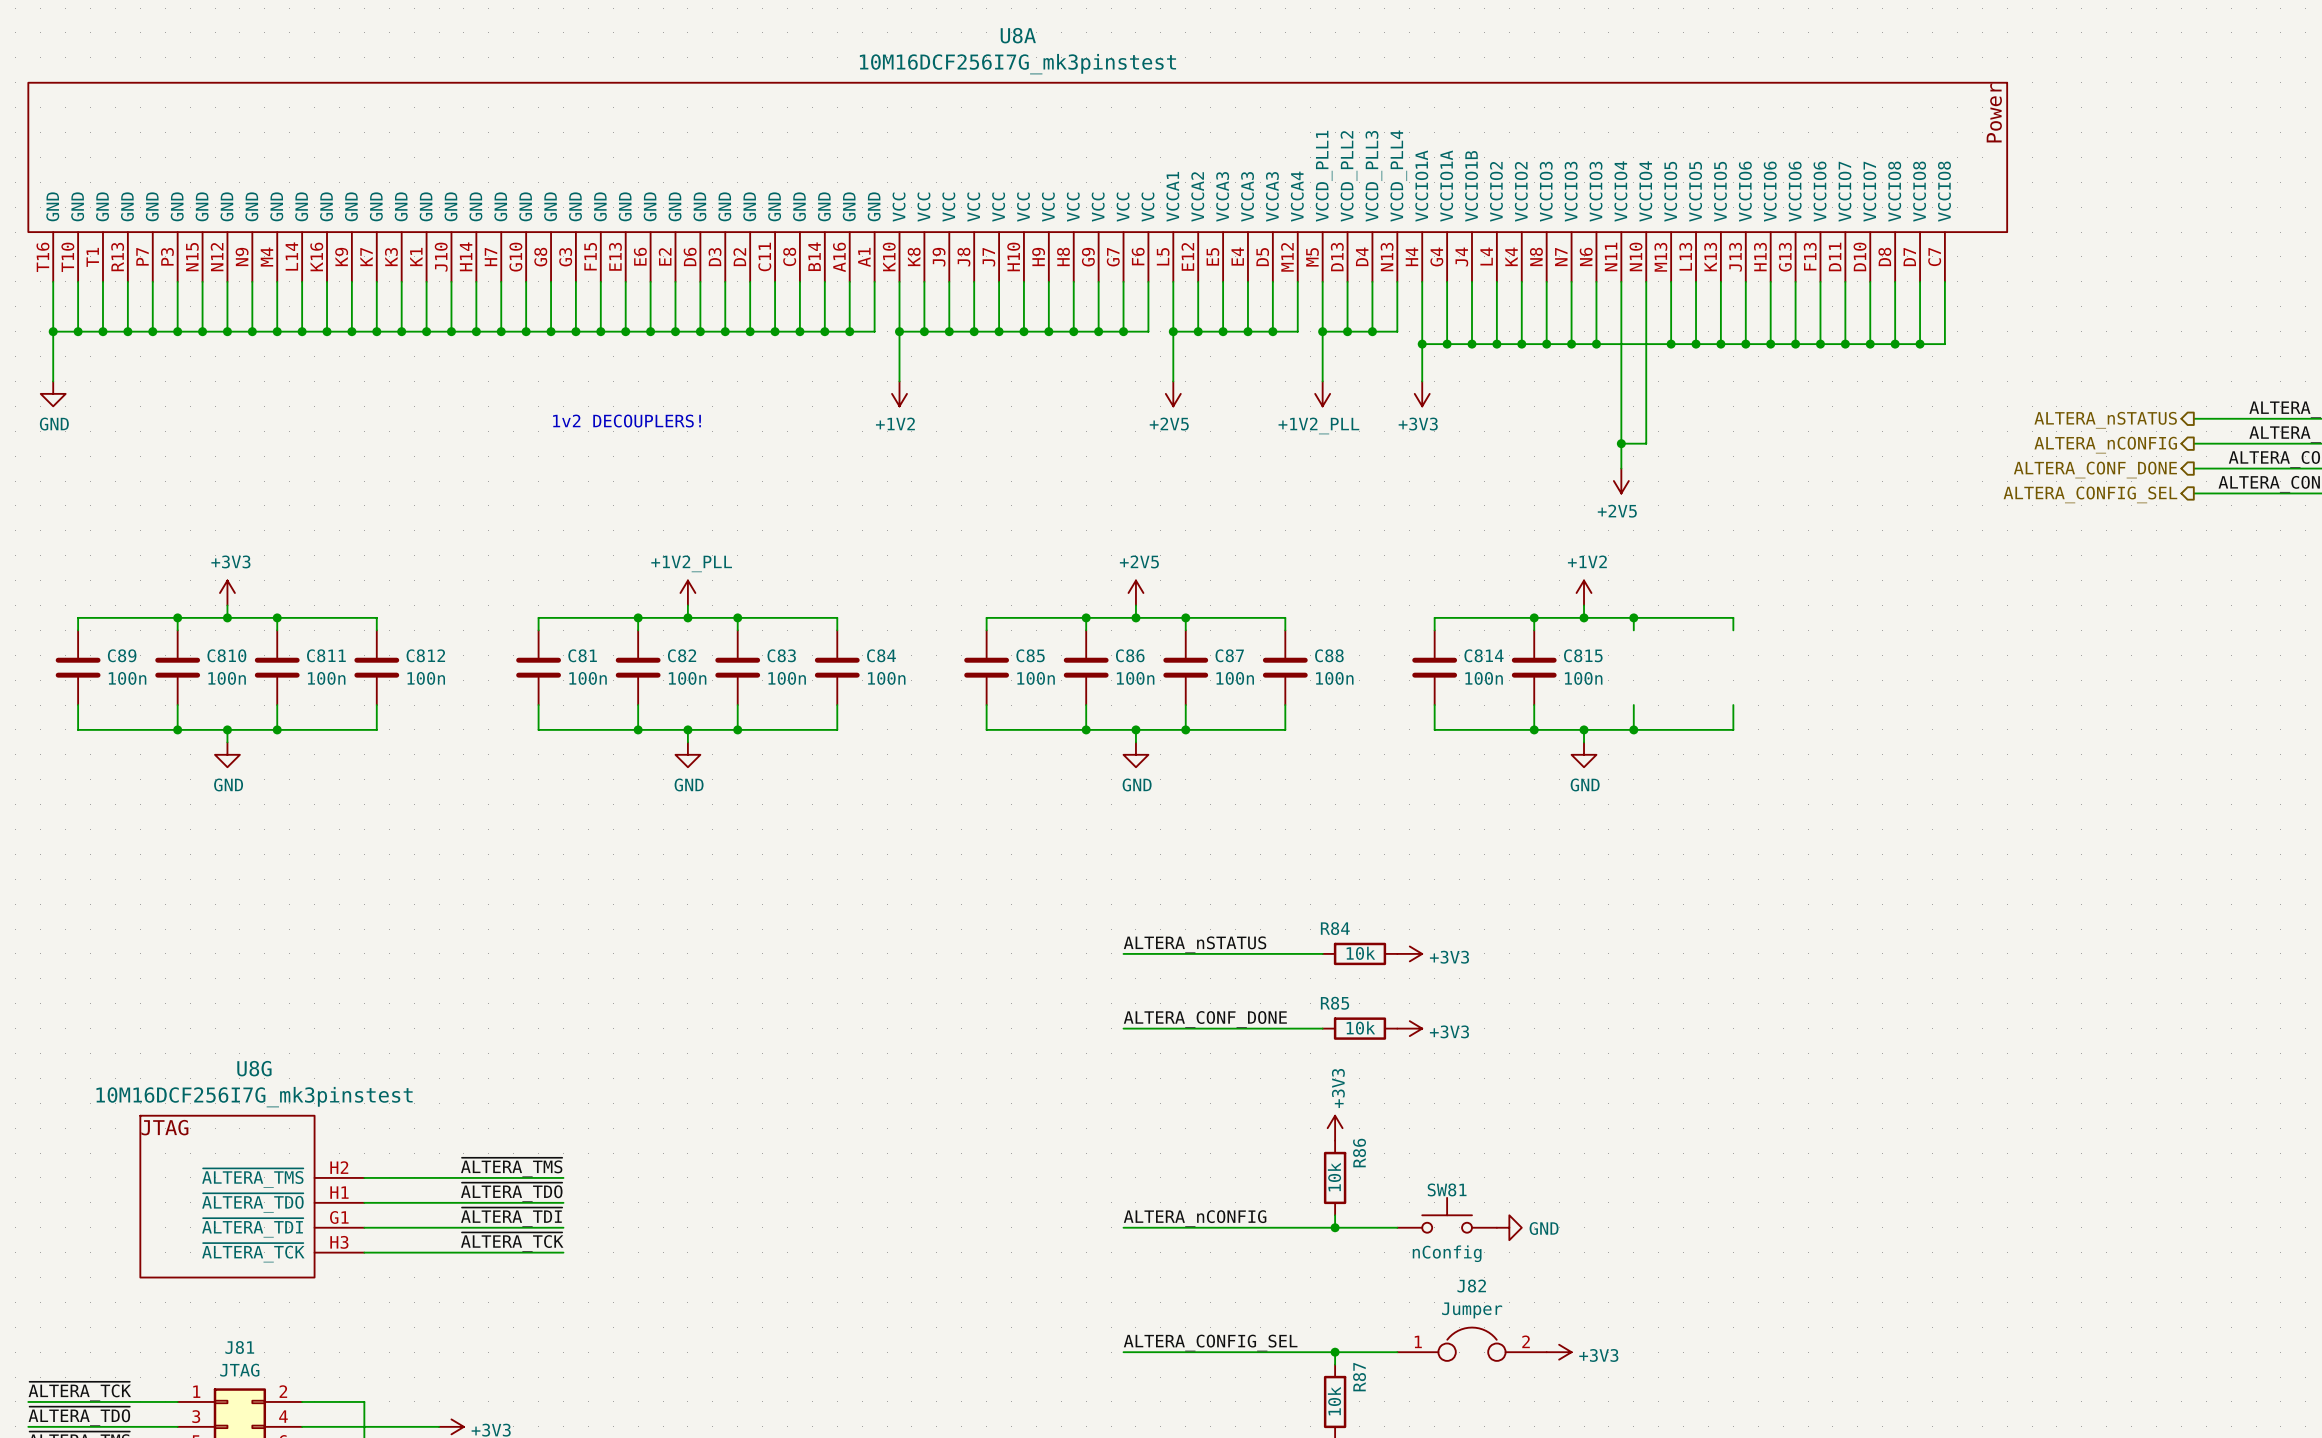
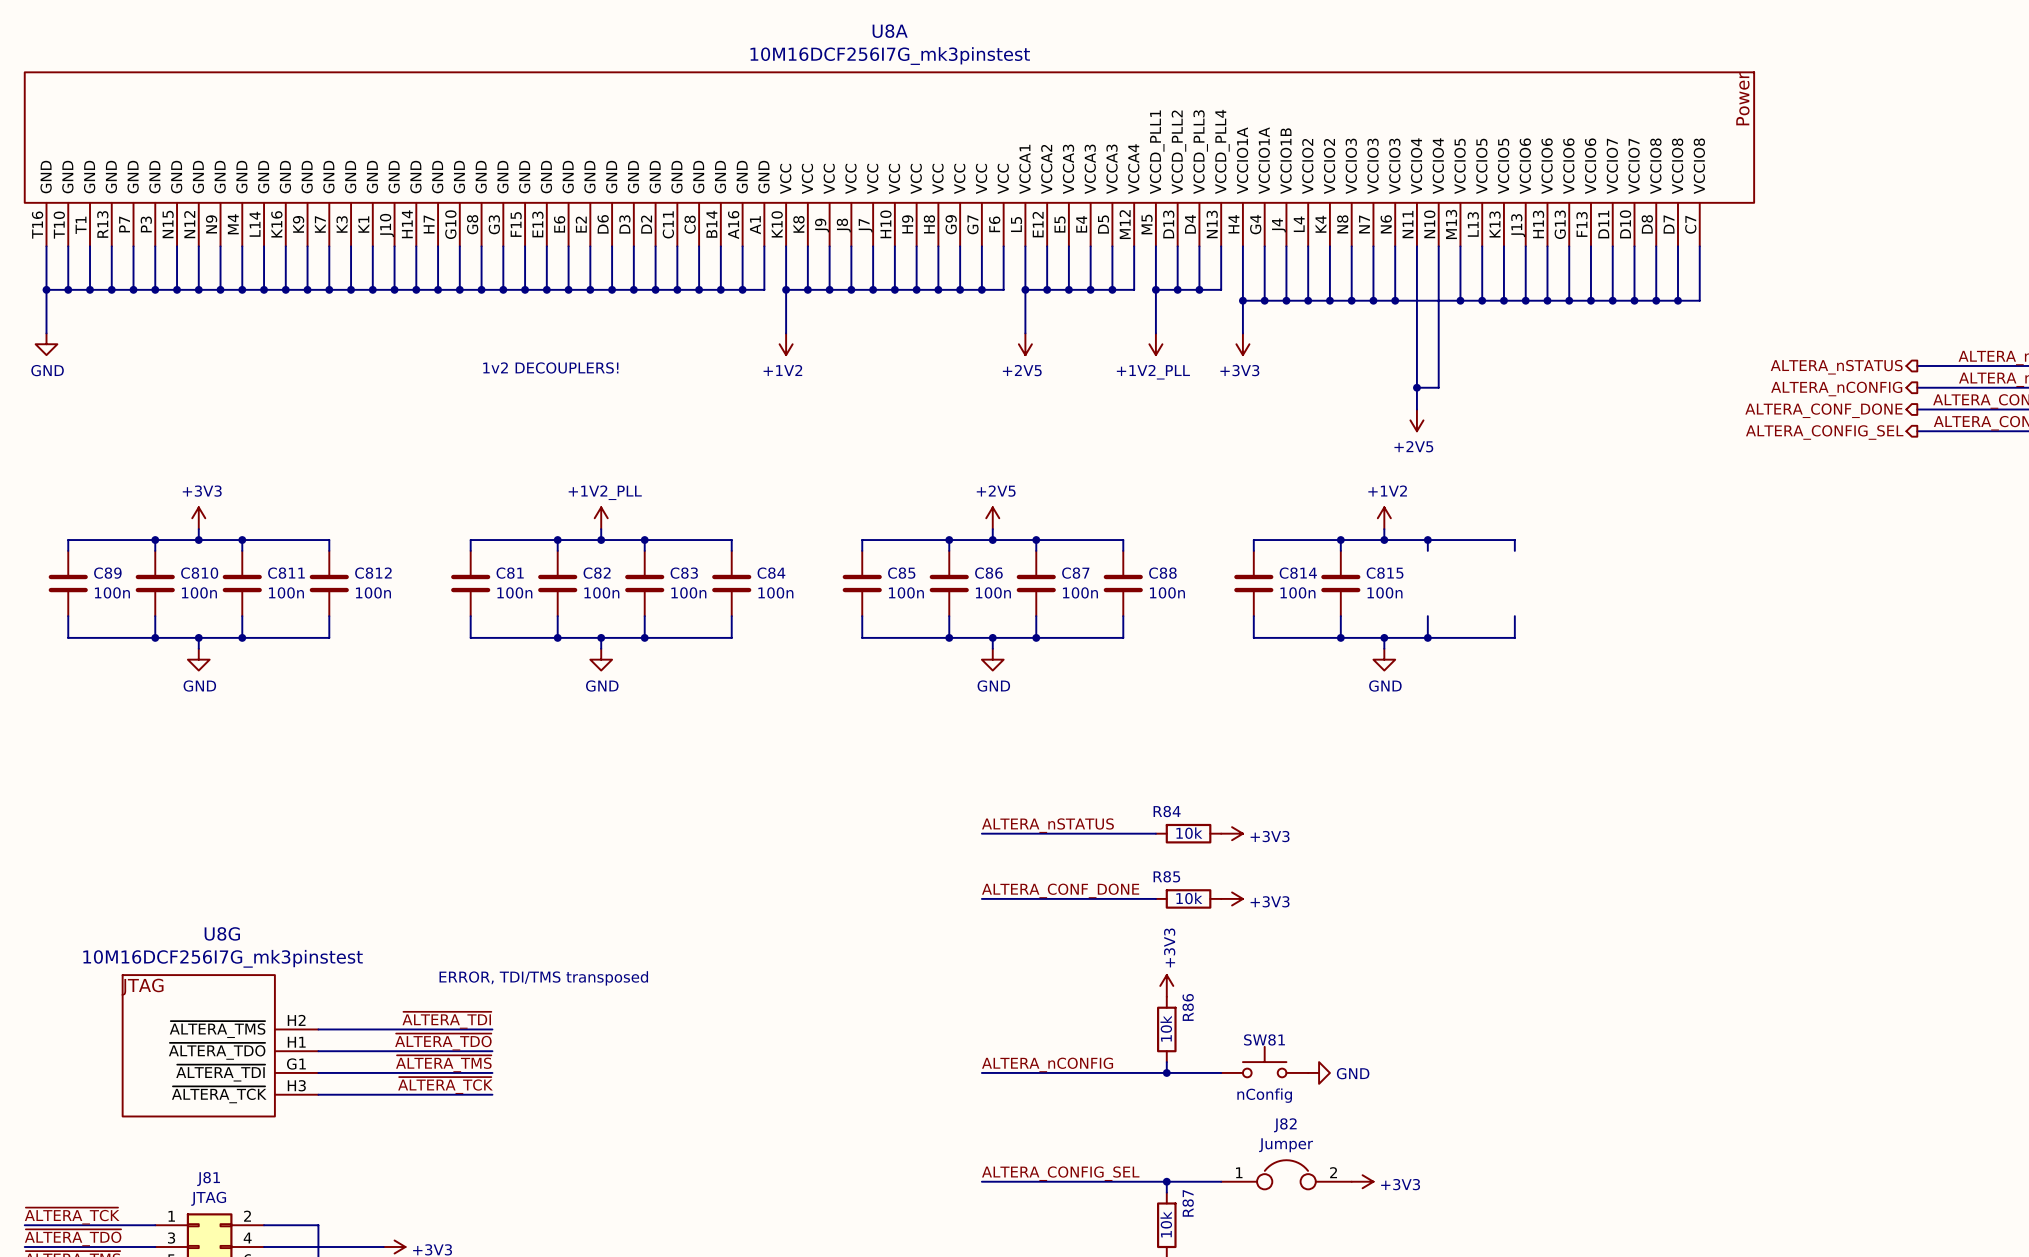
text: none -> ERROR, TDI/TMS transposed (543, 978)
label: ~{ALTERA_TMS} (511, 1167) -> ~{ALTERA_TDI} (446, 1020)
label: ~{ALTERA_TDI} (511, 1217) -> ~{ALTERA_TMS} (443, 1063)

